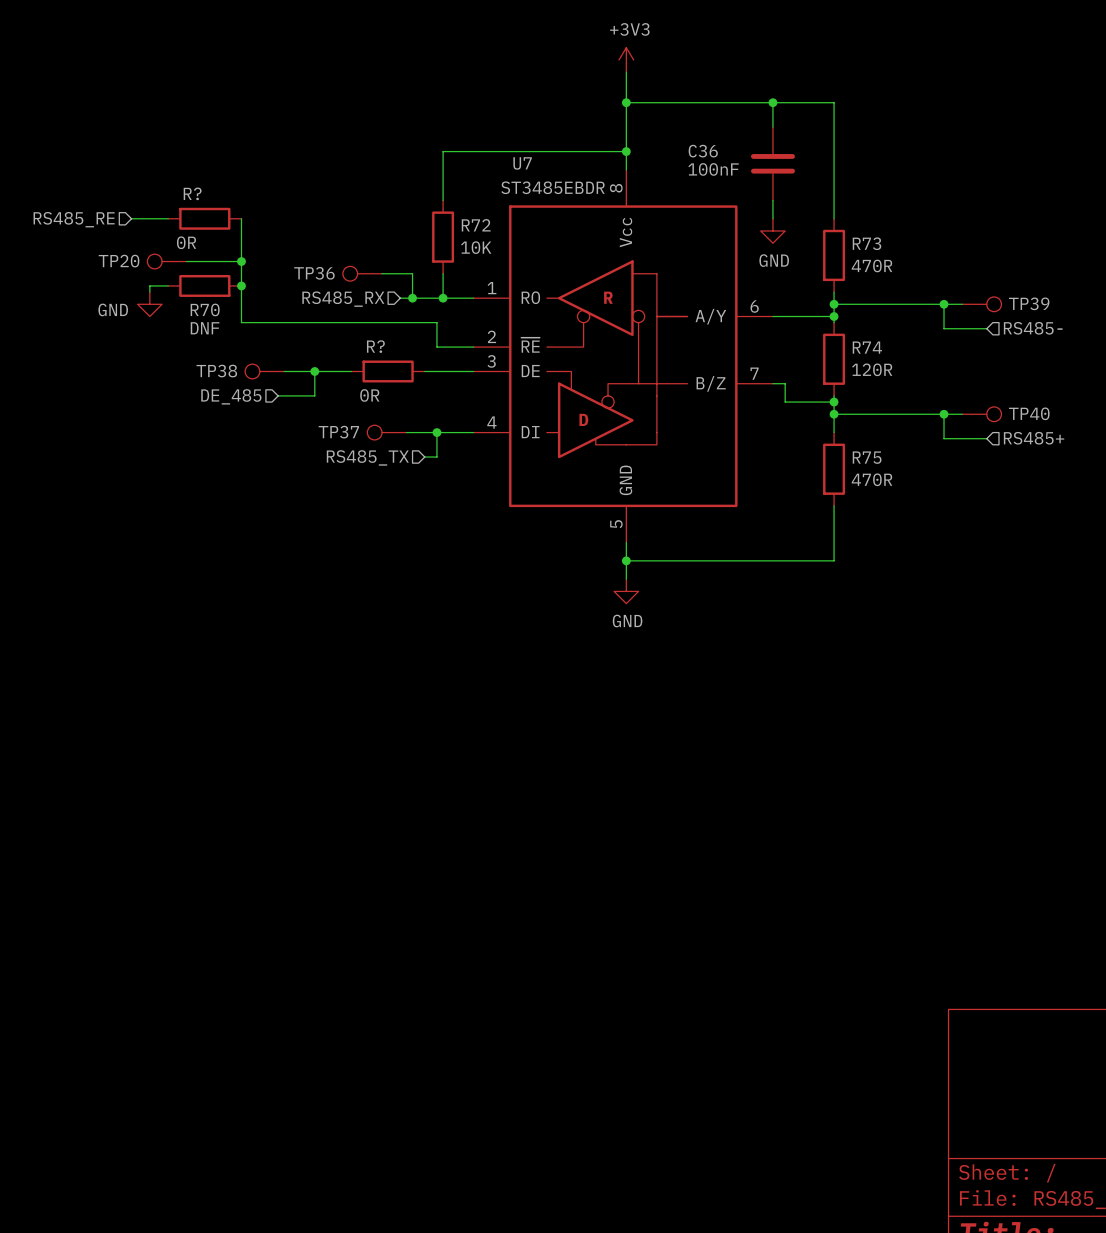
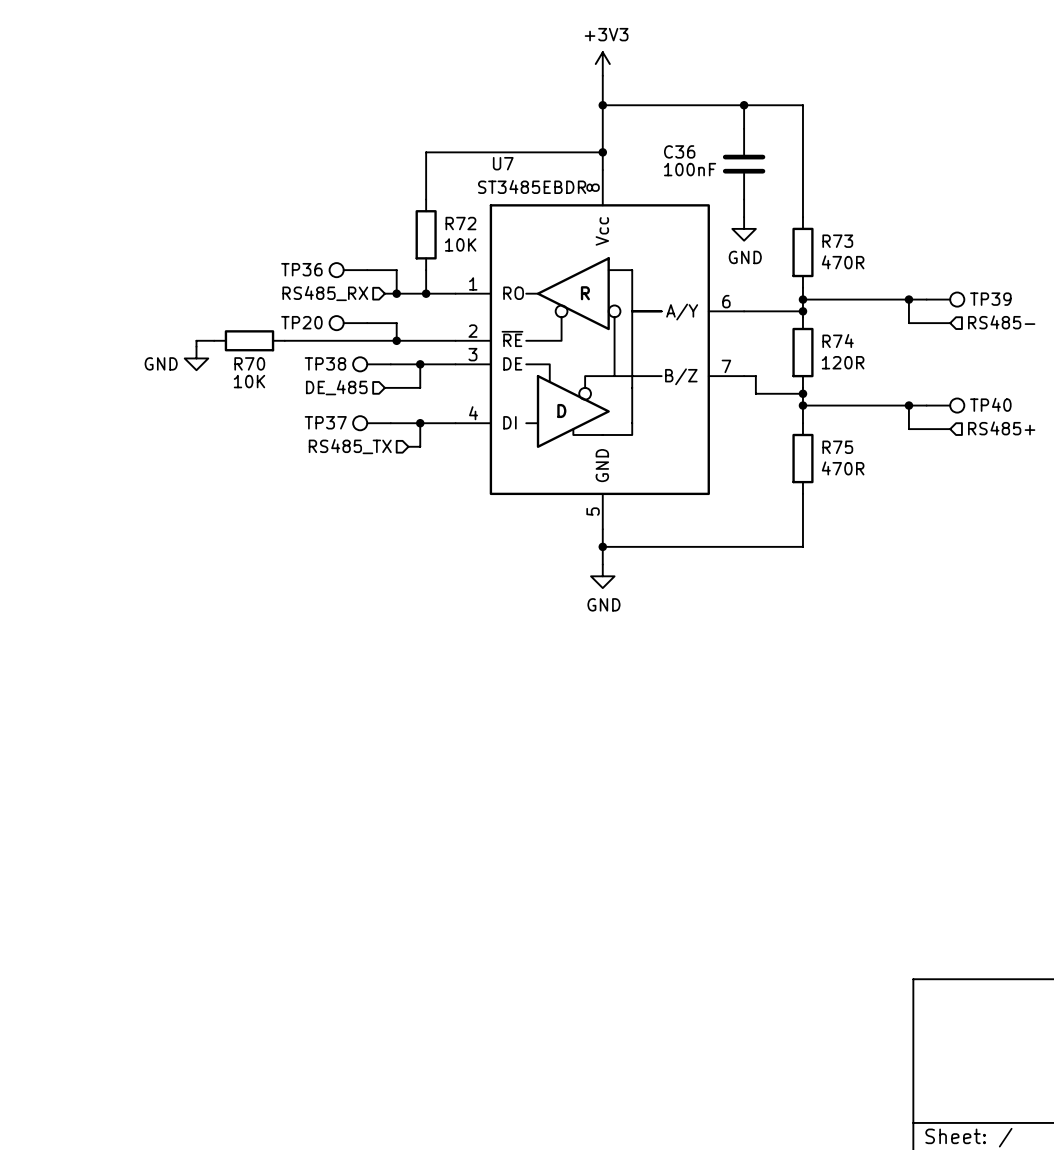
wire: (131, 218) (168, 218) -> none
R?: 0R (204, 218) -> none
wire: (241, 218) (241, 322) (436, 322) (436, 347) -> (284, 340) (420, 340)
hierarchical label: RS485_RE (74, 219) -> none
TP20 position: (166, 261) -> (348, 323)
wire: (186, 261) (241, 261) -> none
junction: (241, 261) -> none
wire: (168, 285) (149, 285) (149, 292) -> (214, 340) (196, 340) (196, 346)
R70 position: (204, 285) -> (249, 340)
junction: (241, 285) -> none
power symbol position: GND (149, 304) -> GND (196, 358)
R70 value: DNF (205, 328) -> 10K (249, 381)
wire: none -> (367, 323) (396, 323) (396, 340)
junction: none -> (396, 340)
TP38 position: (264, 371) -> (371, 364)
wire: (284, 371) (351, 371) -> none
wire: (314, 371) (314, 395) (278, 395) -> (420, 364) (420, 387) (384, 387)
junction: (314, 371) -> none
R?: 0R (388, 371) -> none
junction: none -> (420, 364)
hierarchical label position: DE_485 (231, 396) -> DE_485 (336, 387)

